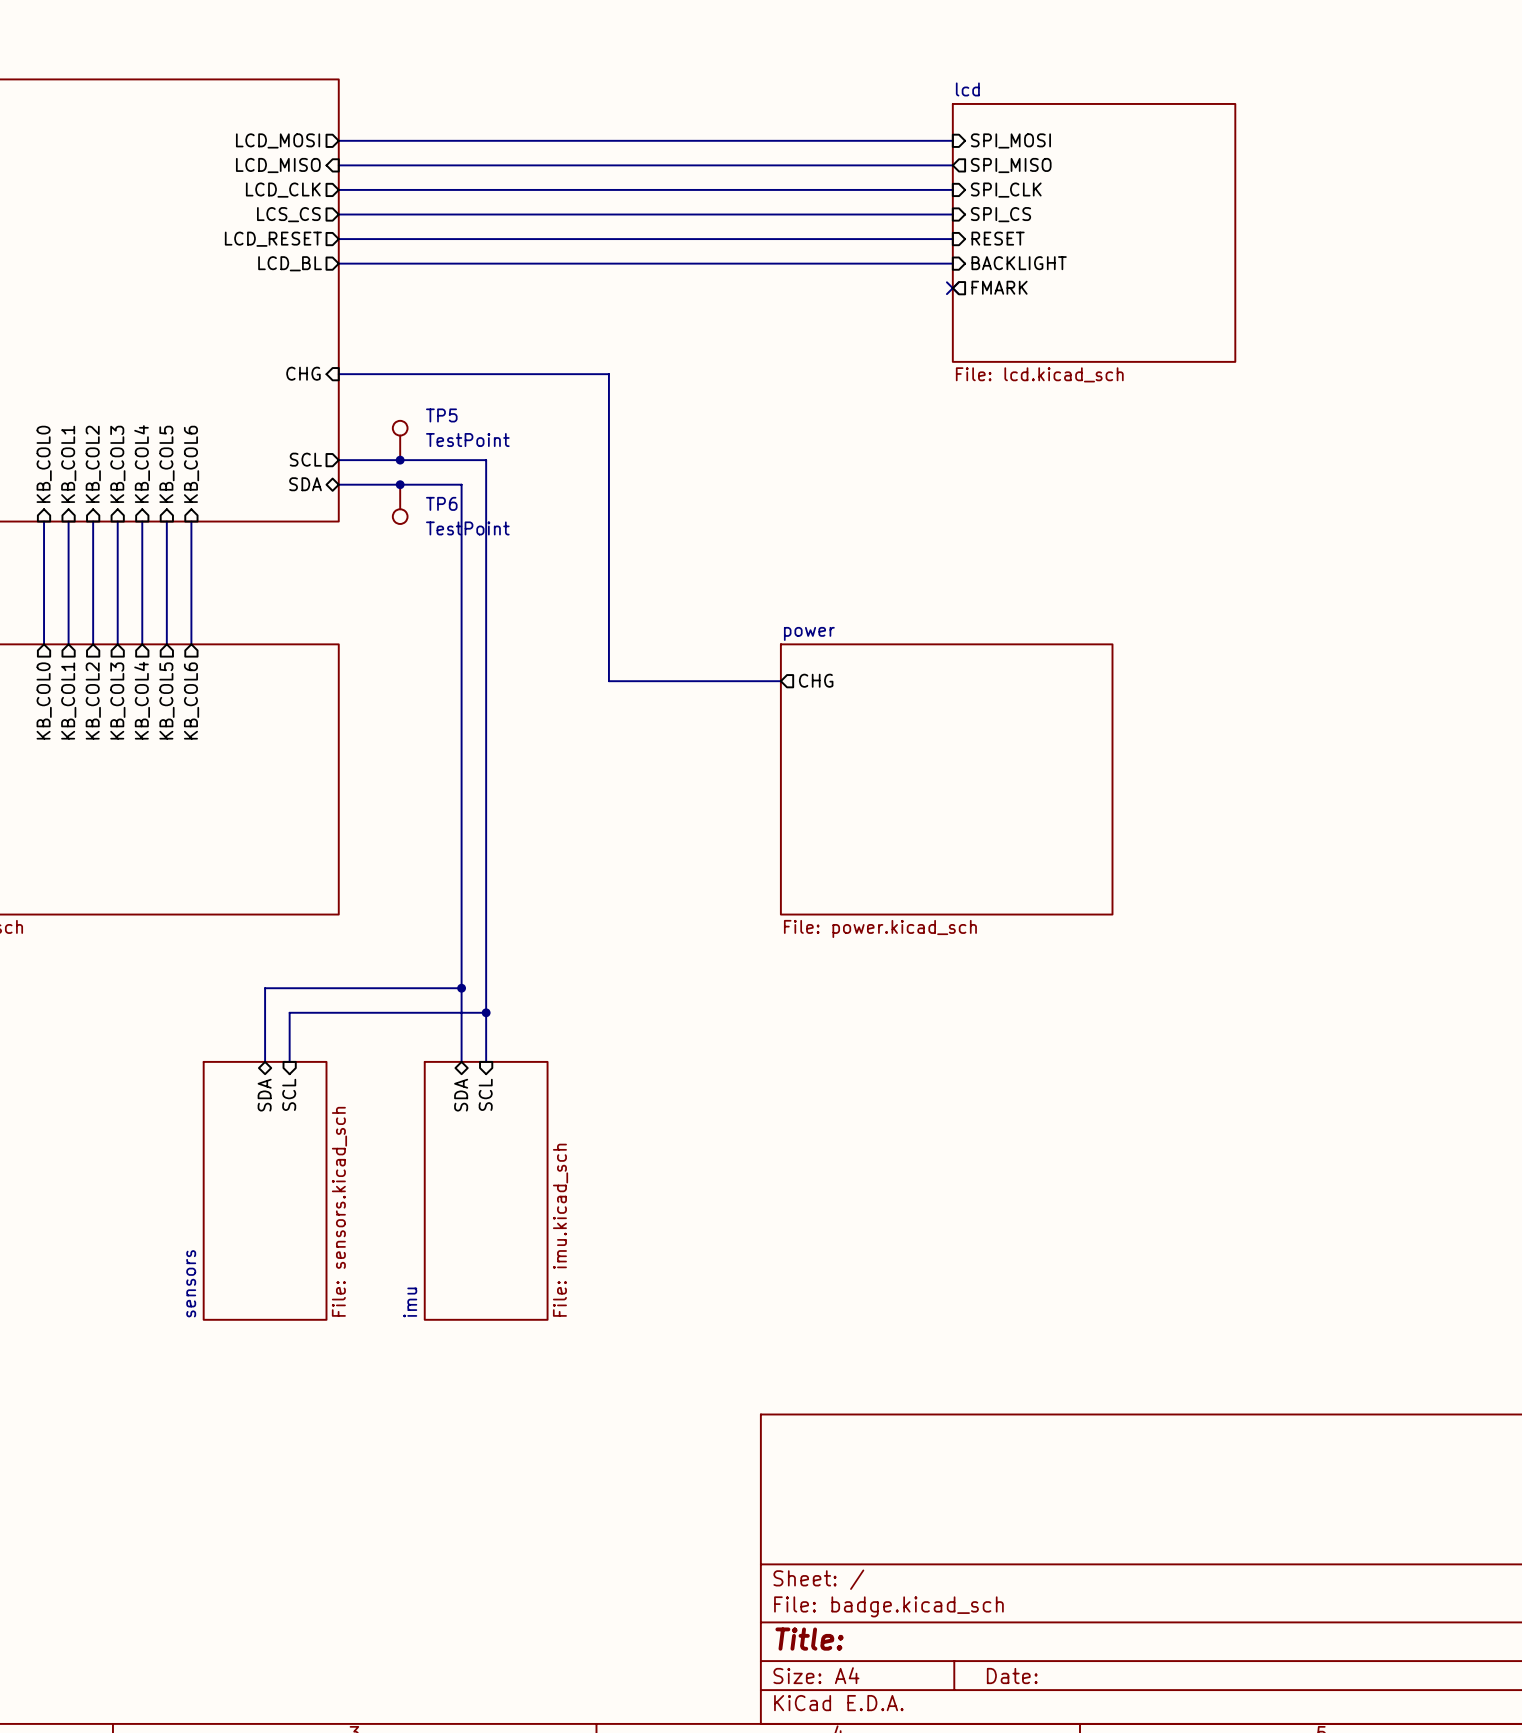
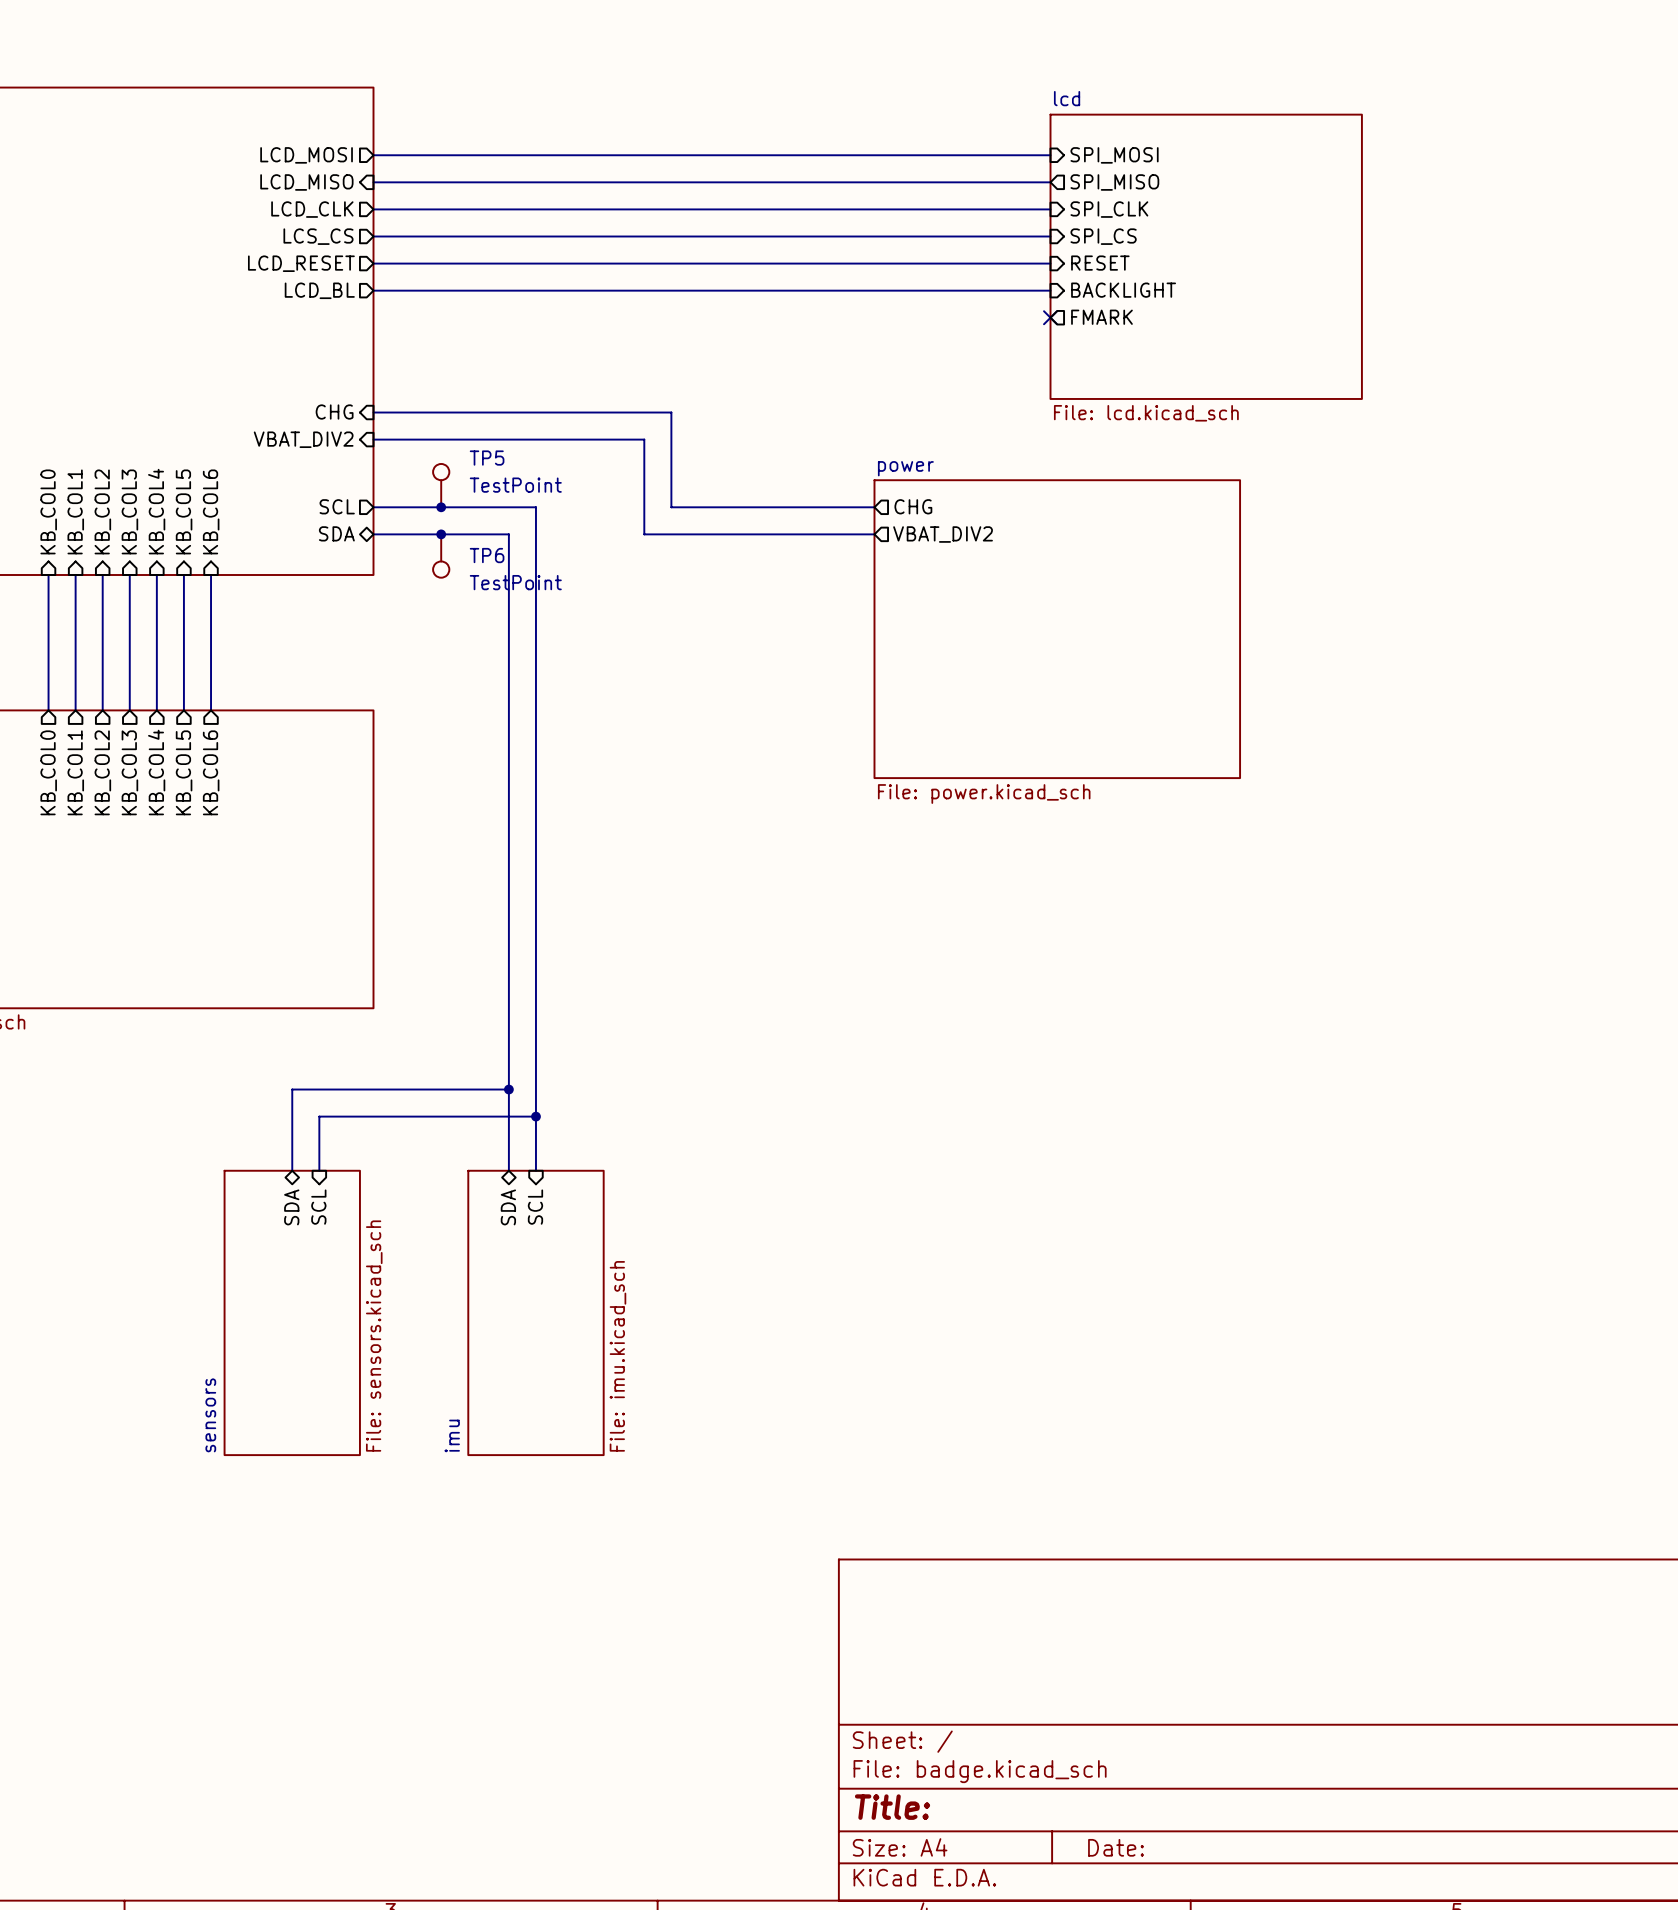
sheet pin: none -> VBAT_DIV2 (303, 439)
wire: none -> (373, 439) (644, 439) (644, 534) (874, 534)
wire: (608, 460) (608, 681) (780, 681) -> (671, 507) (874, 507)
sheet pin: none -> VBAT_DIV2 (943, 534)
sheet pin position: CHG (816, 680) -> CHG (913, 506)
sheet power position: (946, 779) -> (1057, 629)

